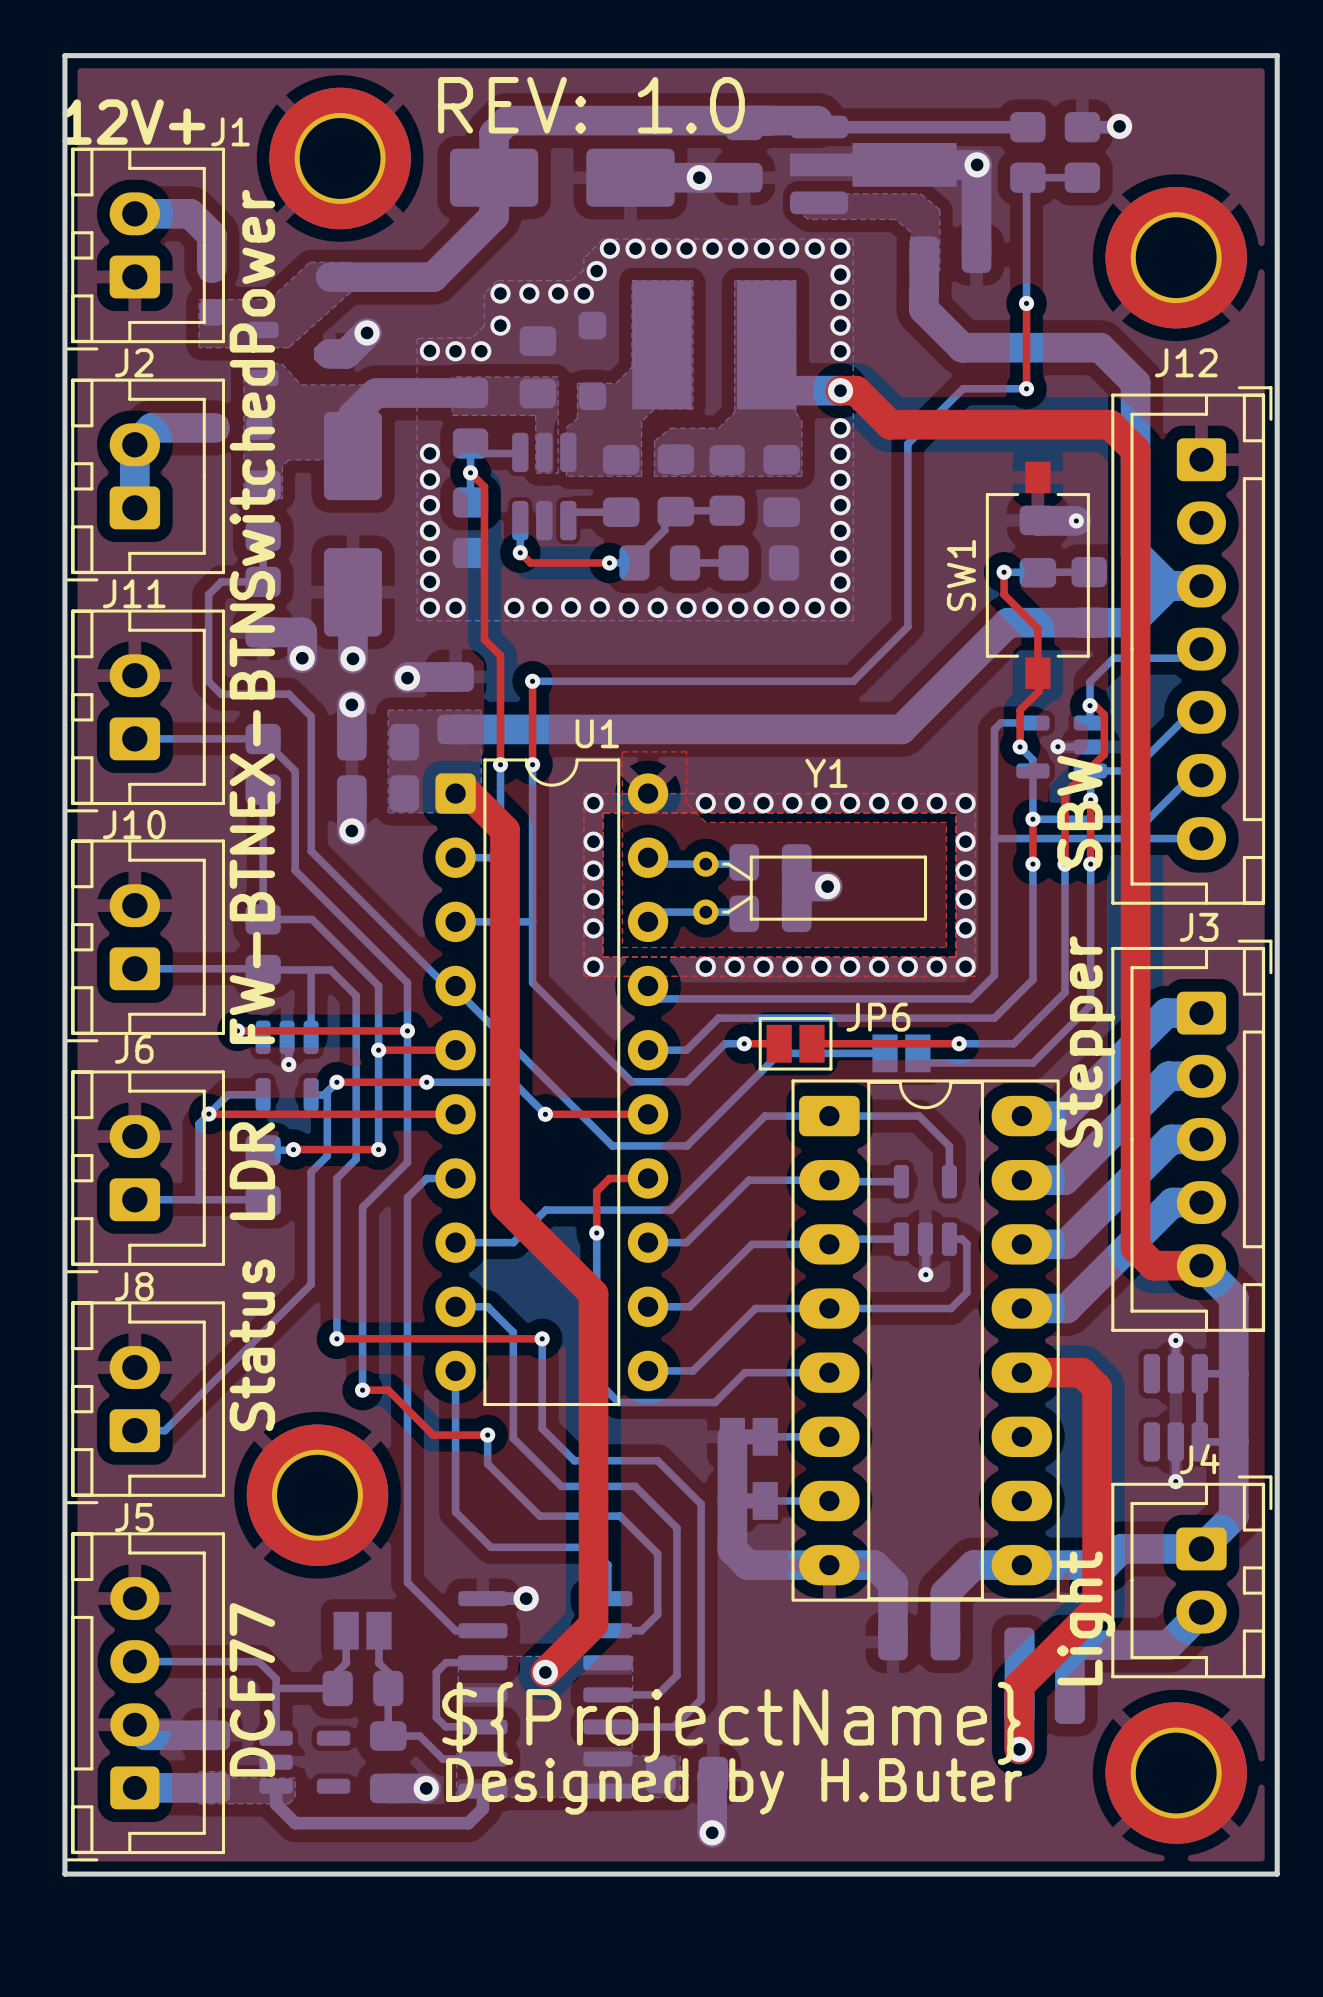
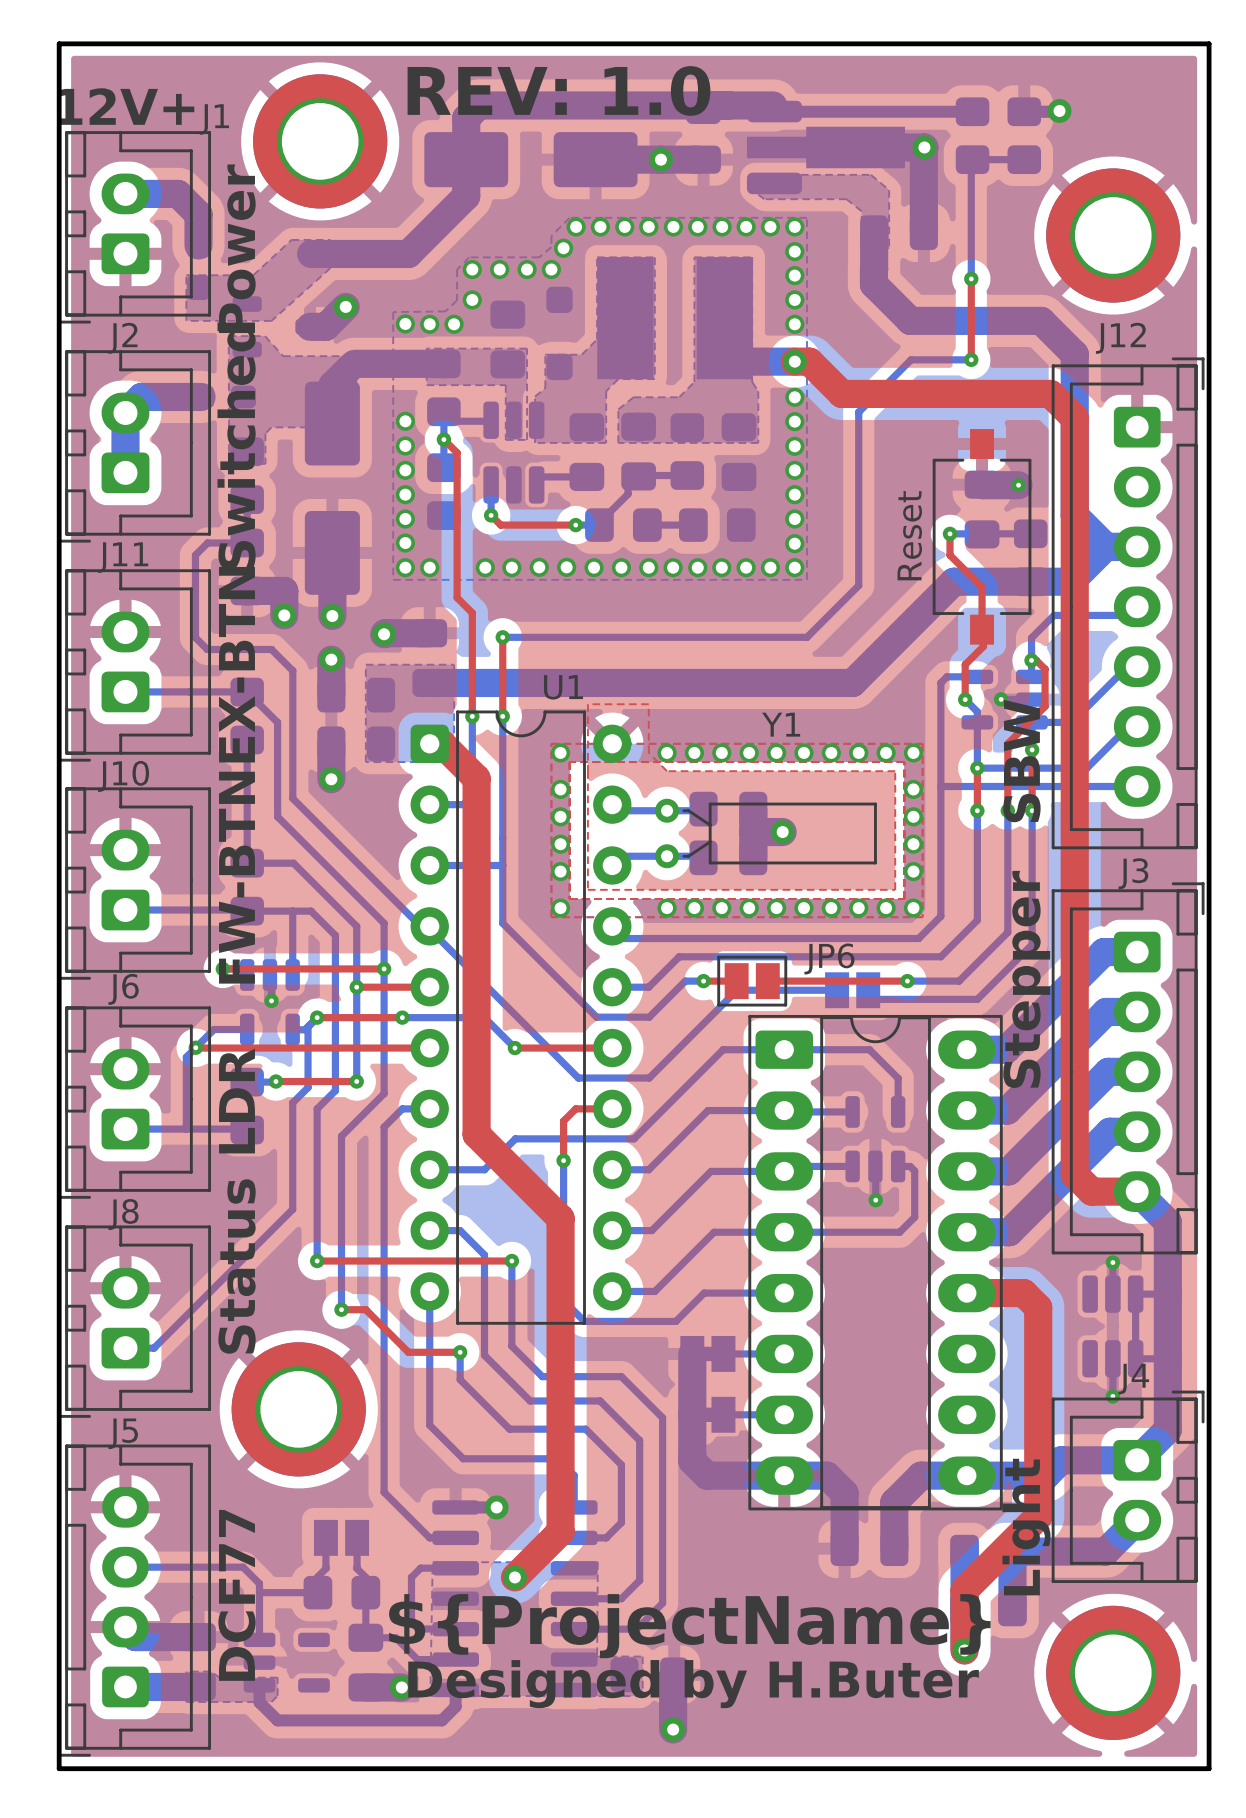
SW1 name: SW1 (961, 575) -> Reset (909, 535)

